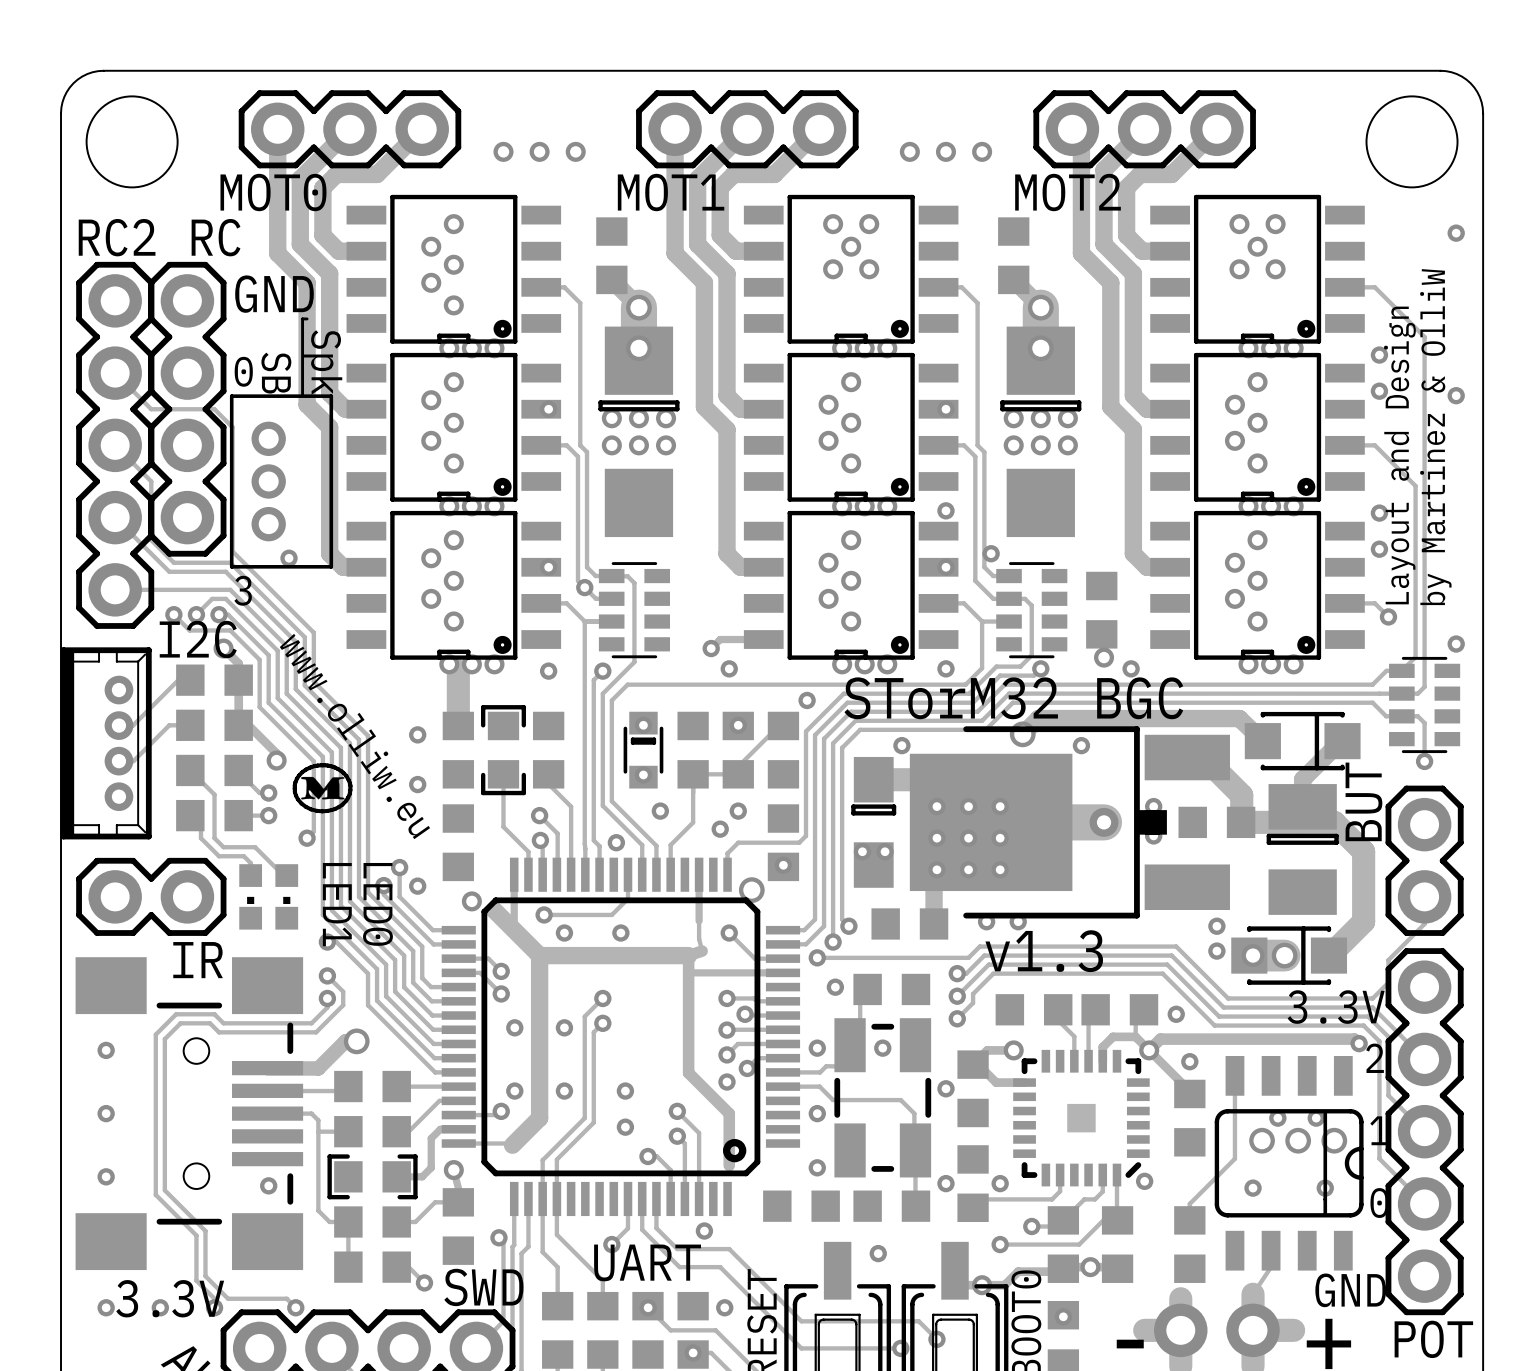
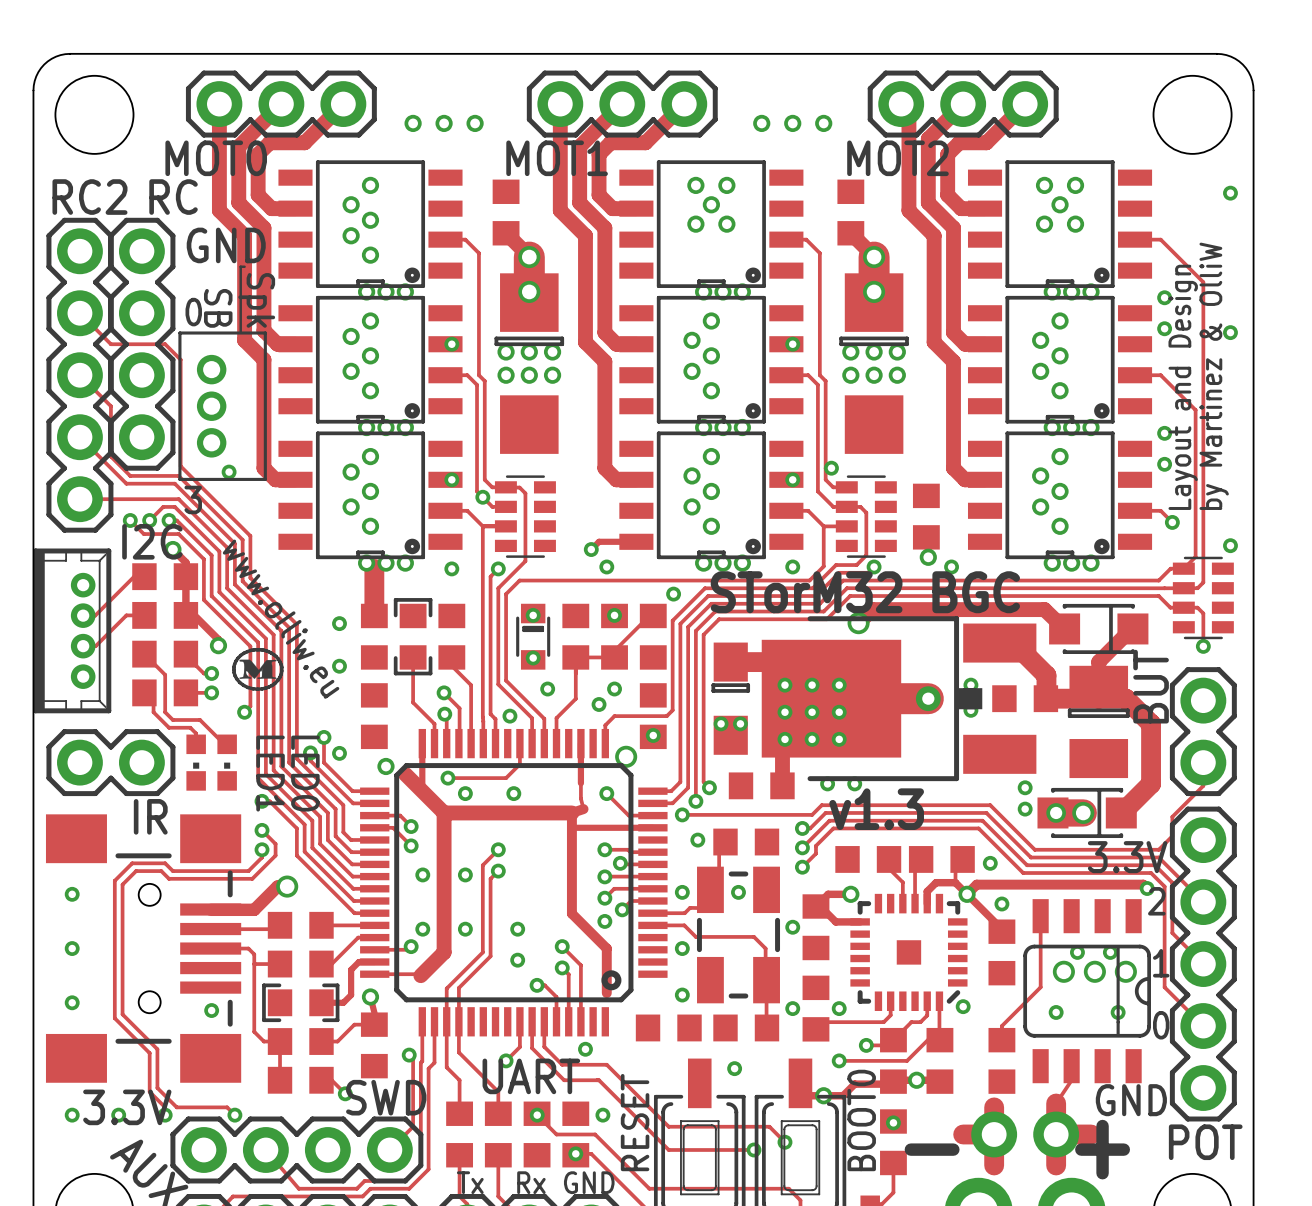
via: (945, 510) -> none
via: (901, 745) -> none
via: (1081, 745) -> none

